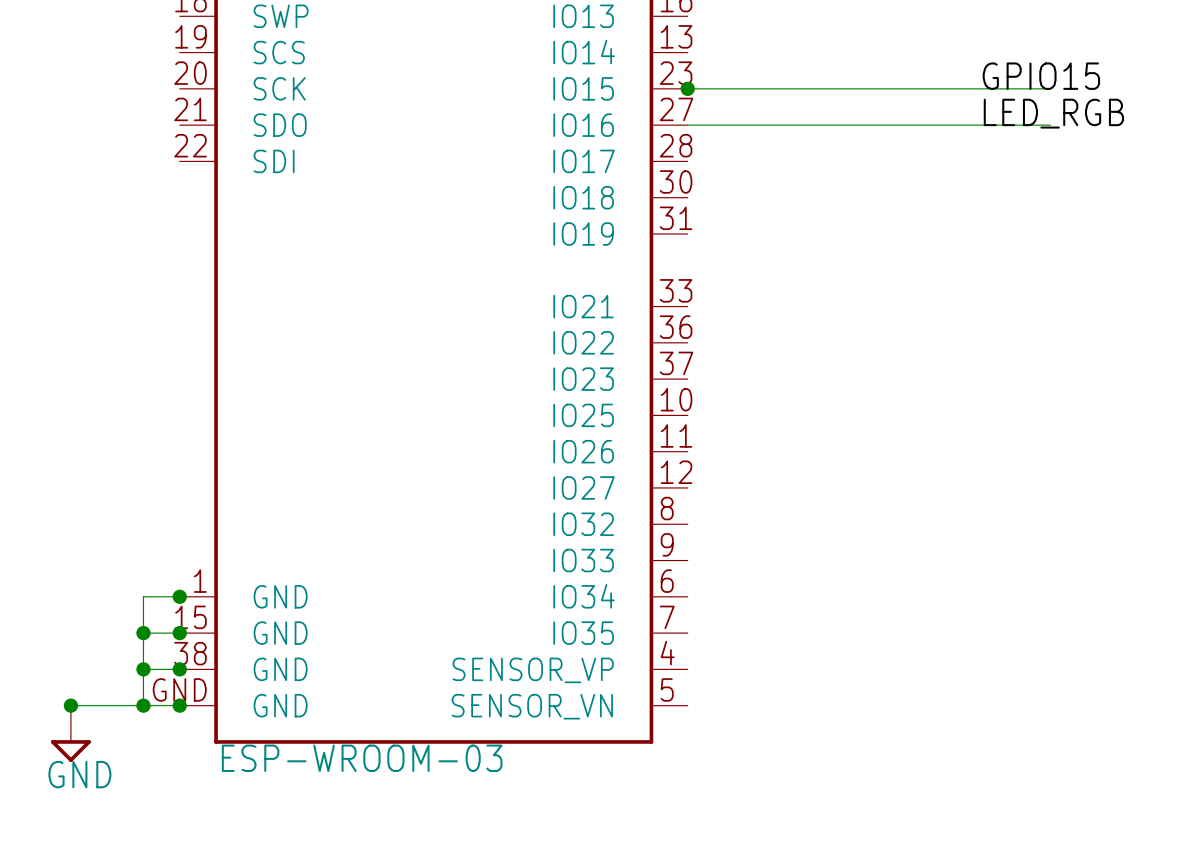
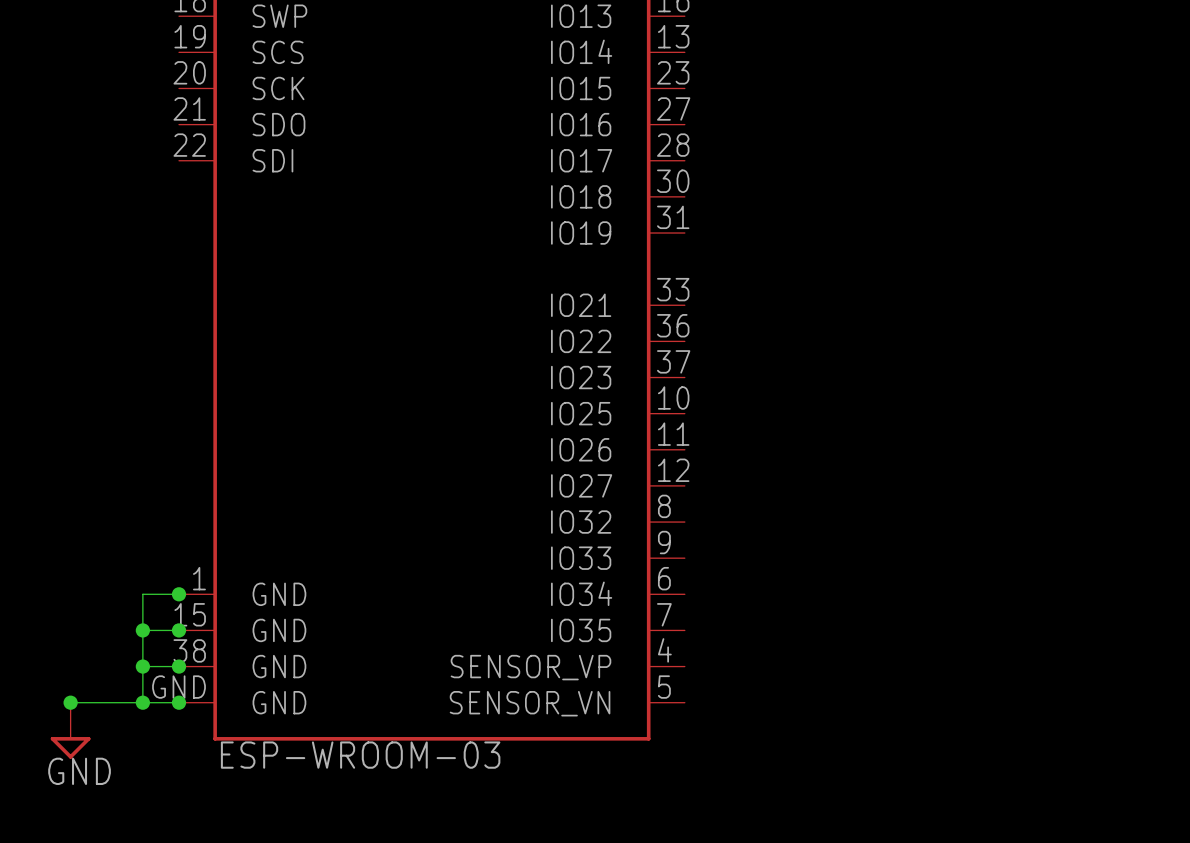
label: GPIO15 (1041, 76) -> none
wire: (687, 88) (1050, 88) -> none
junction: (687, 88) -> none
label: LED_RGB (1053, 113) -> none
wire: (687, 125) (1050, 125) -> none

